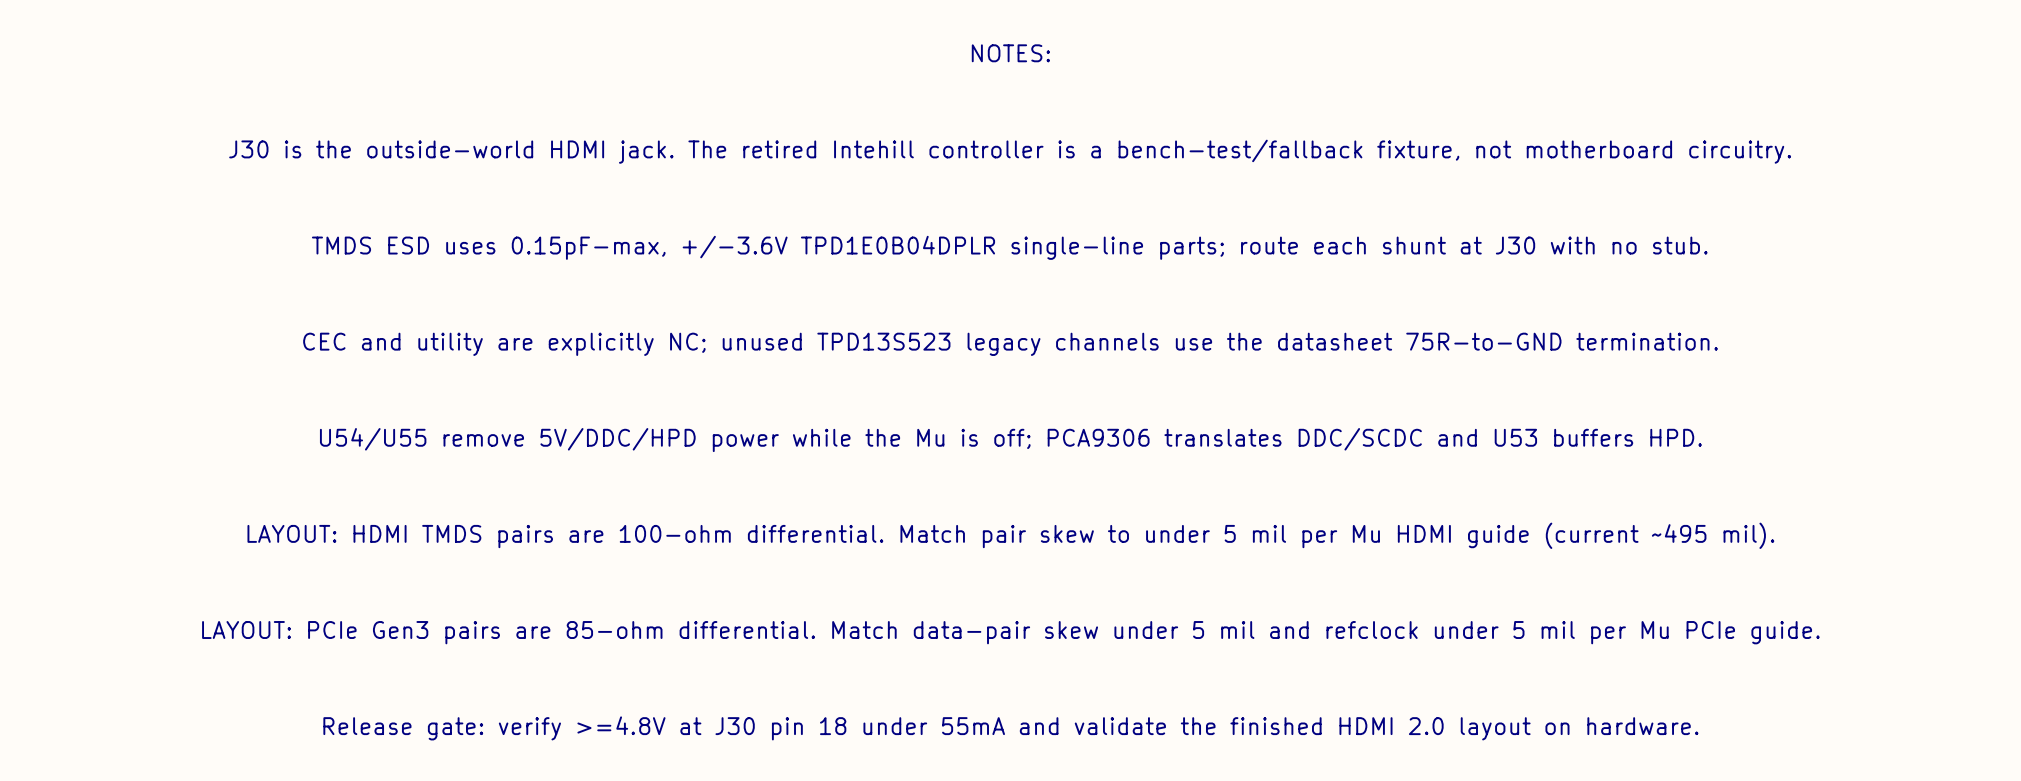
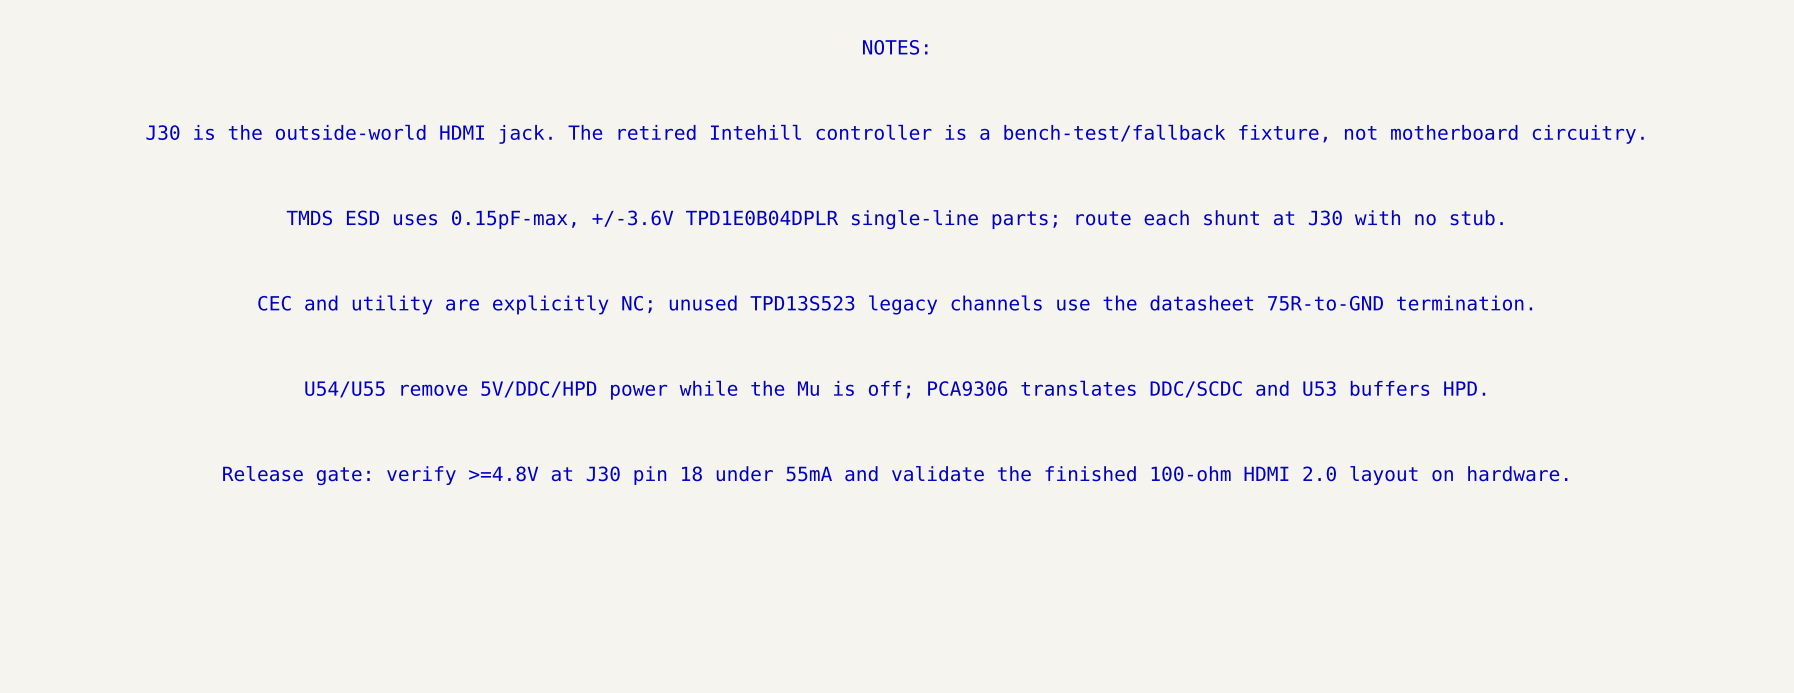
text: LAYOUT: HDMI TMDS pairs are 100-ohm differential. Match pair skew to under 5 mil per Mu HDMI guide (current ~495 mil). (1010, 535) -> Release gate: verify >=4.8V at J30 pin 18 under 55mA and validate the finished 100-ohm HDMI 2.0 layout on hardware. (895, 475)
text: LAYOUT: PCIe Gen3 pairs are 85-ohm differential. Match data-pair skew under 5 mil and refclock under 5 mil per Mu PCIe guide. (1010, 632) -> none
text: Release gate: verify >=4.8V at J30 pin 18 under 55mA and validate the finished HDMI 2.0 layout on hardware. (1010, 728) -> none

